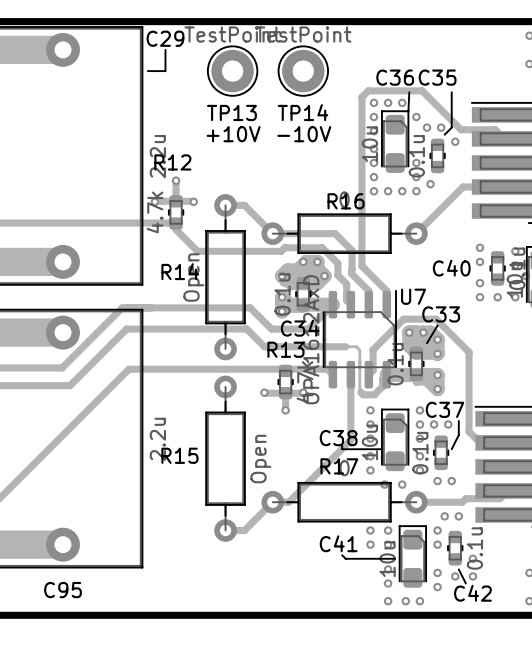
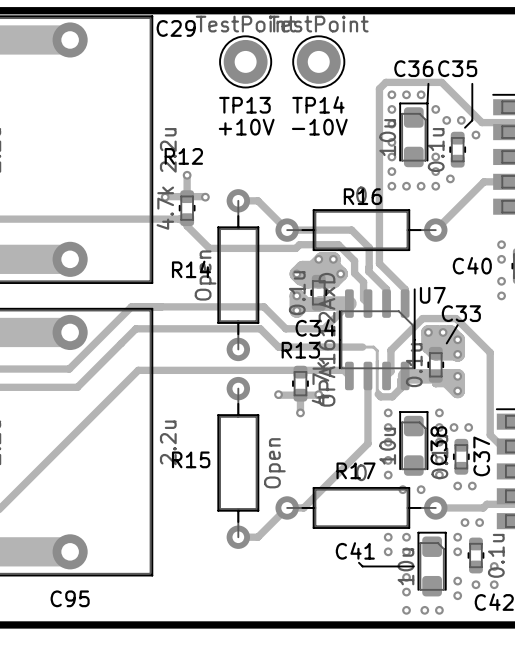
line: (165, 49) (165, 71) (147, 71) -> none
C37 name rotation: 0° (444, 409) -> 90° counterclockwise (481, 456)
line: (458, 420) (458, 435) (451, 449) -> none
C38 name rotation: 0° (338, 438) -> 90° counterclockwise (438, 445)
C38 name position: C38 (338, 438) -> C38 (438, 445)
line: (342, 445) (342, 449) (381, 449) -> none
line: (458, 569) (465, 583) -> none

